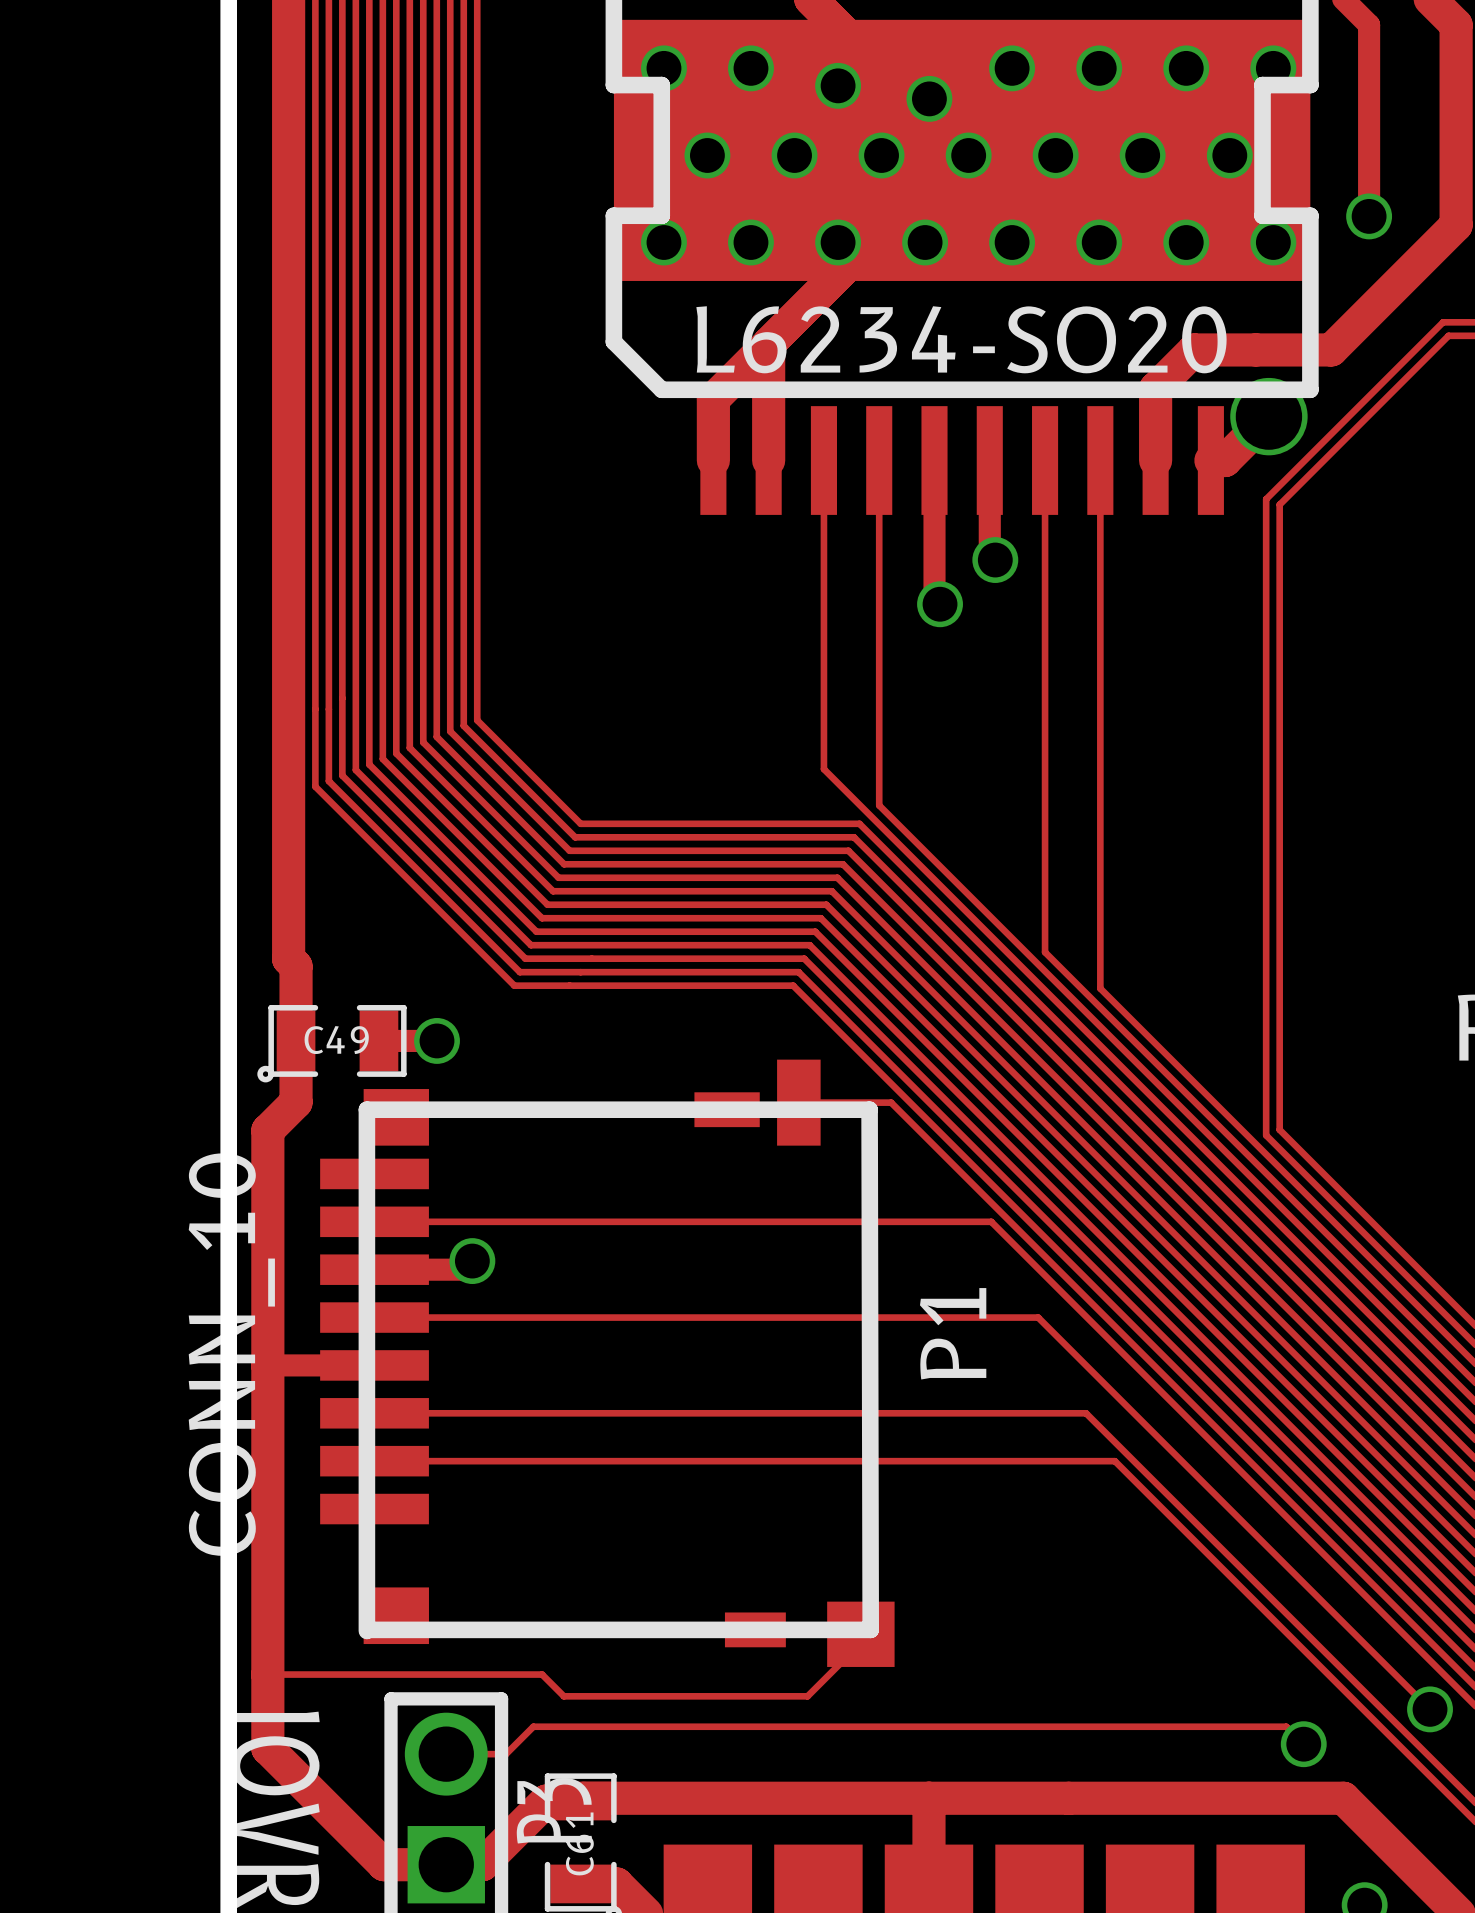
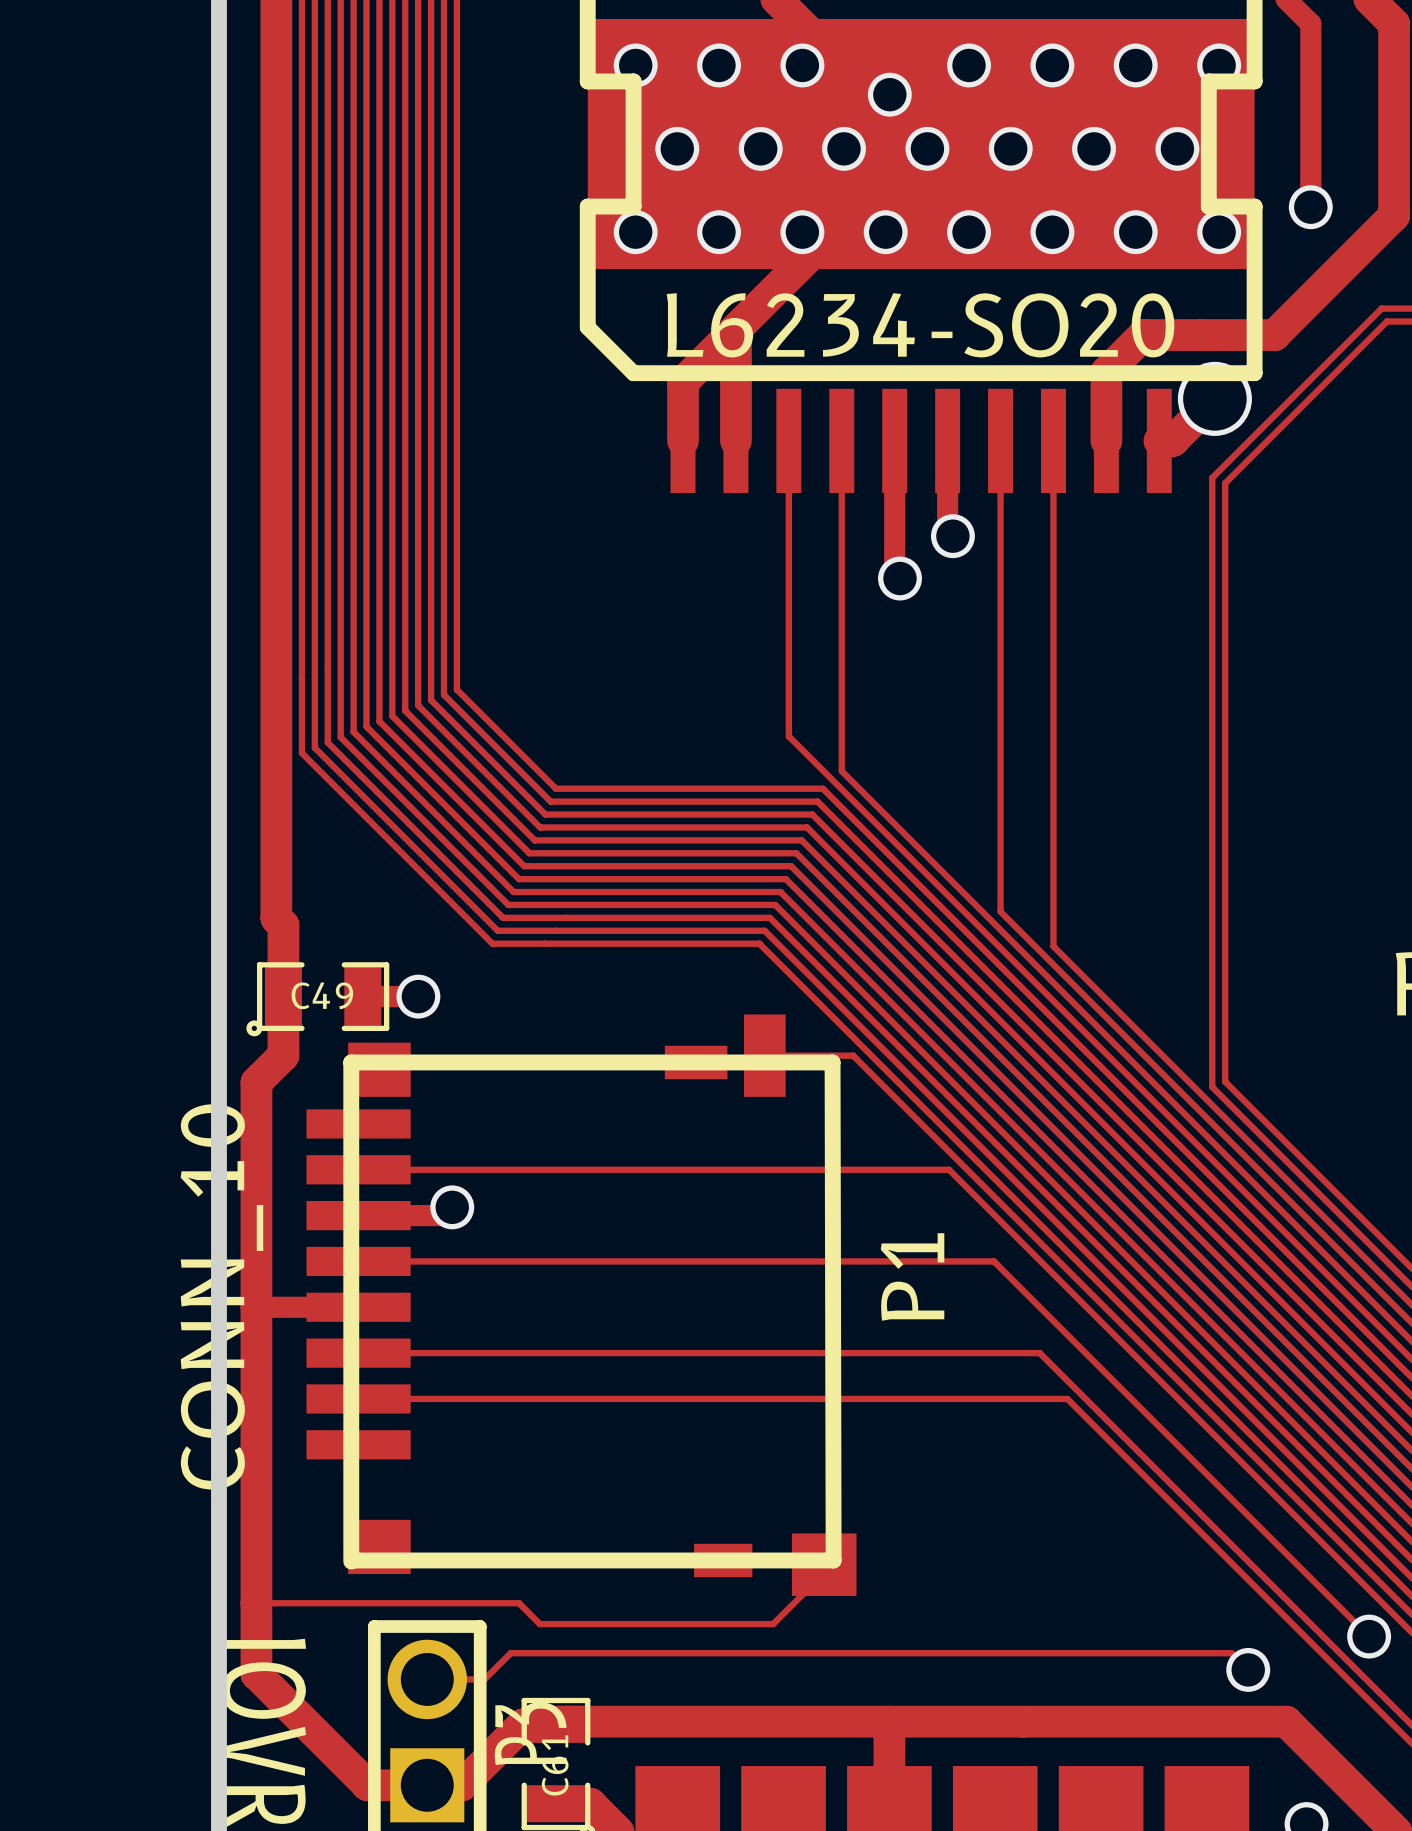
via position: (838, 85) -> (802, 65)

